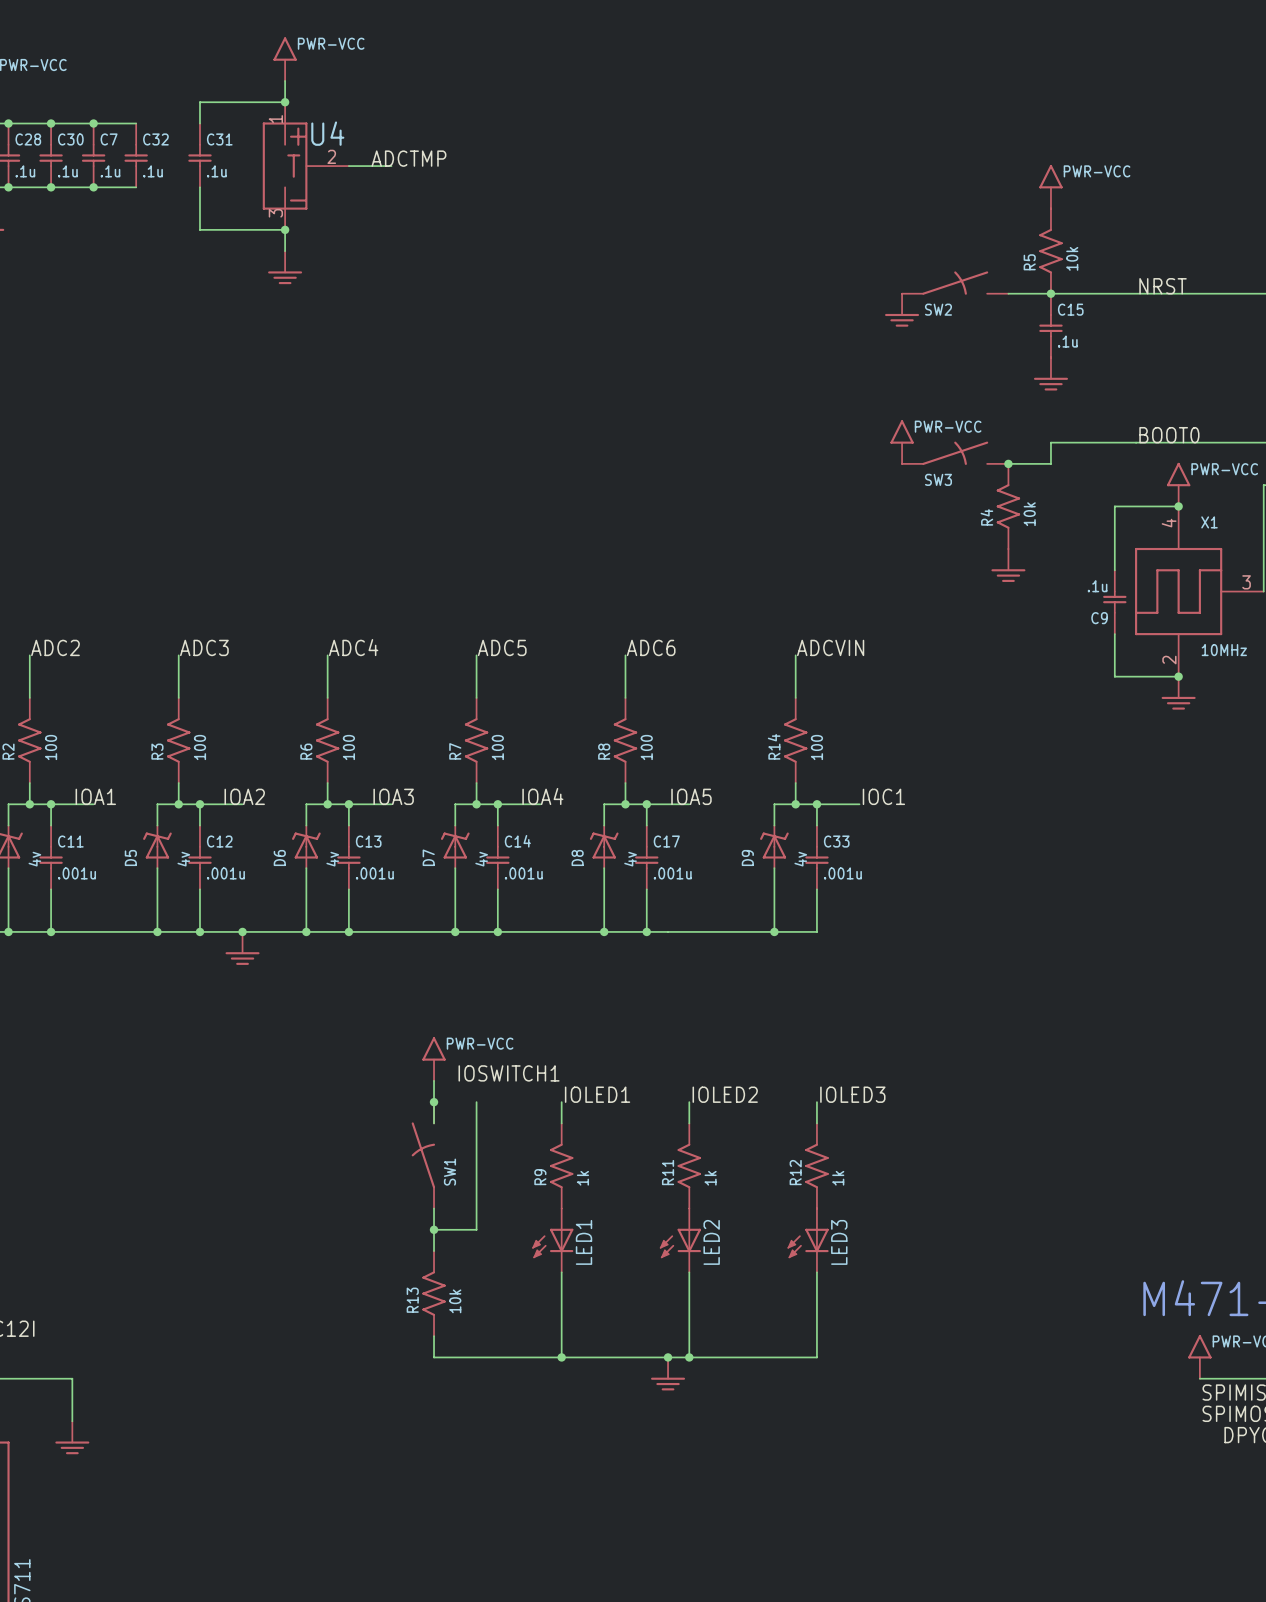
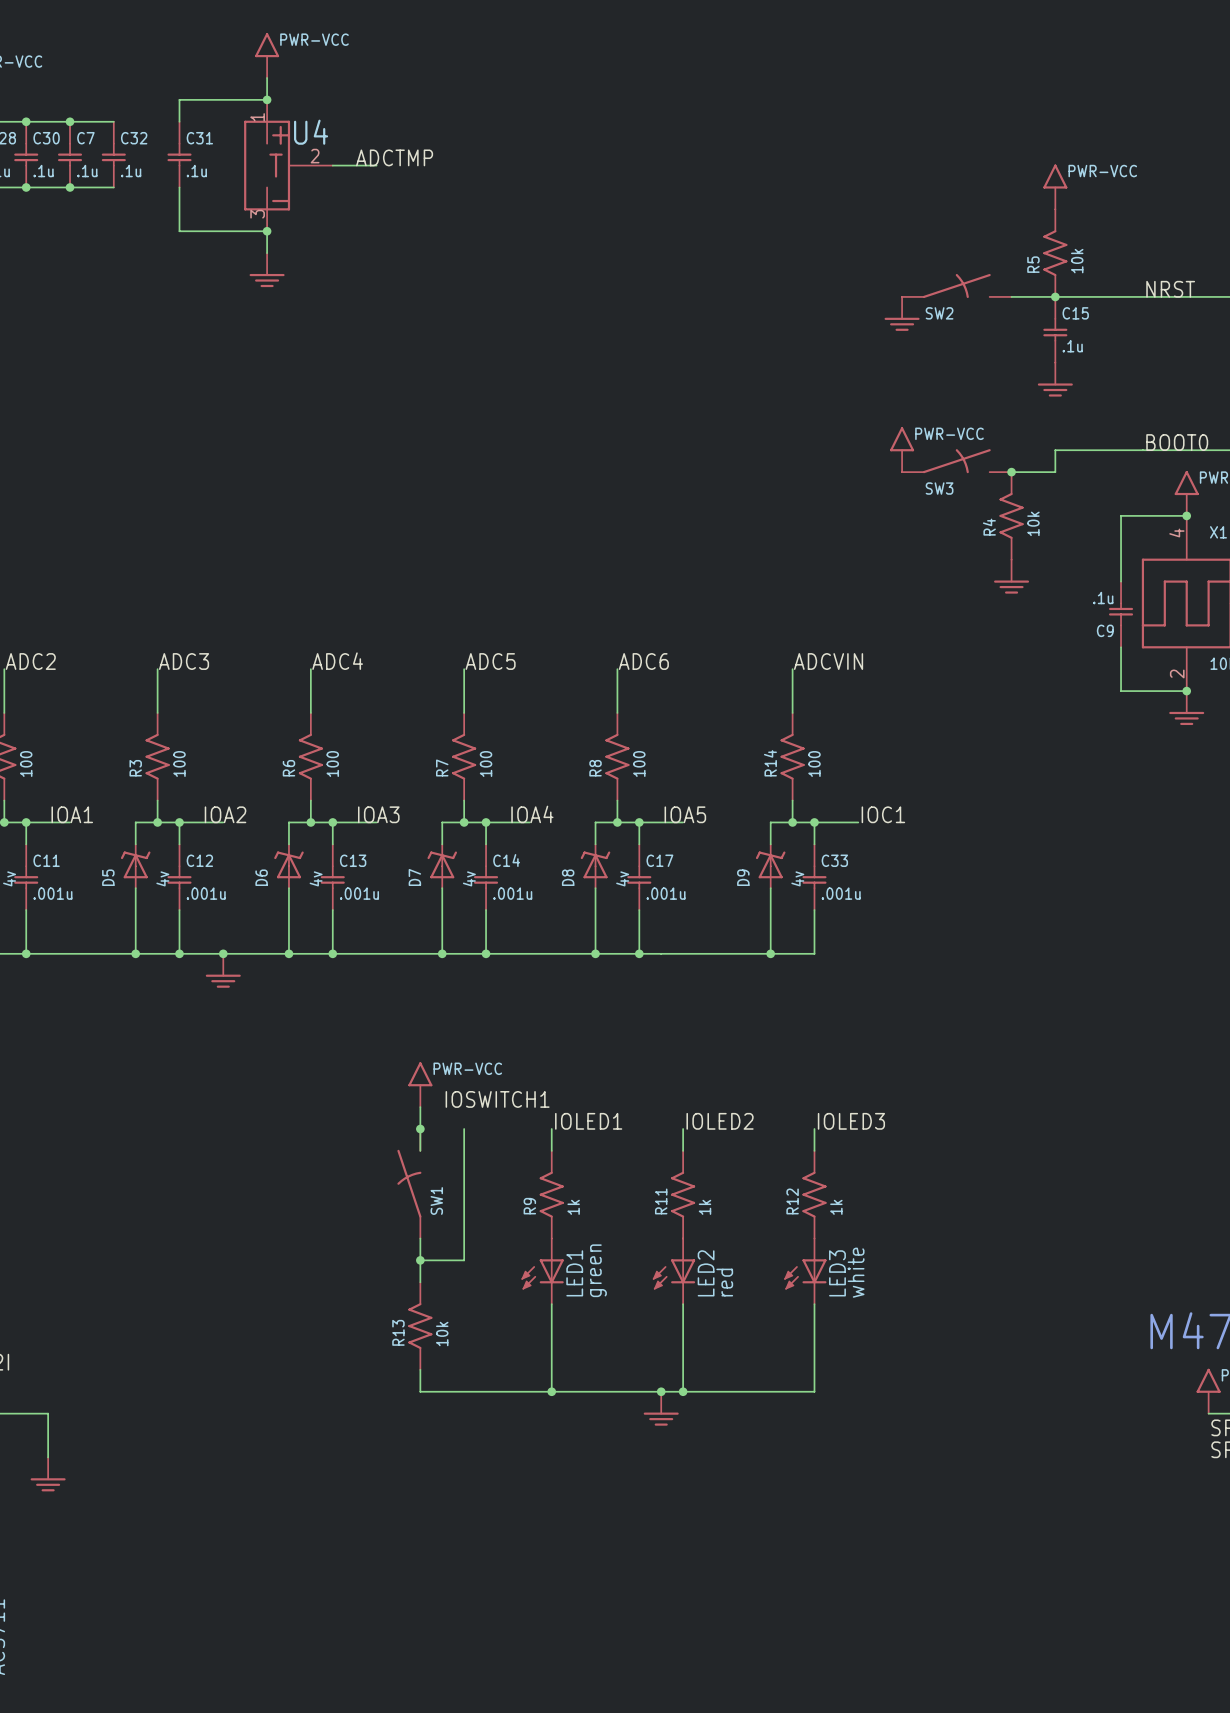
LED1 value: none -> green (598, 1270)
LED3 value: none -> white (856, 1272)
LED2 value: none -> red (724, 1282)

